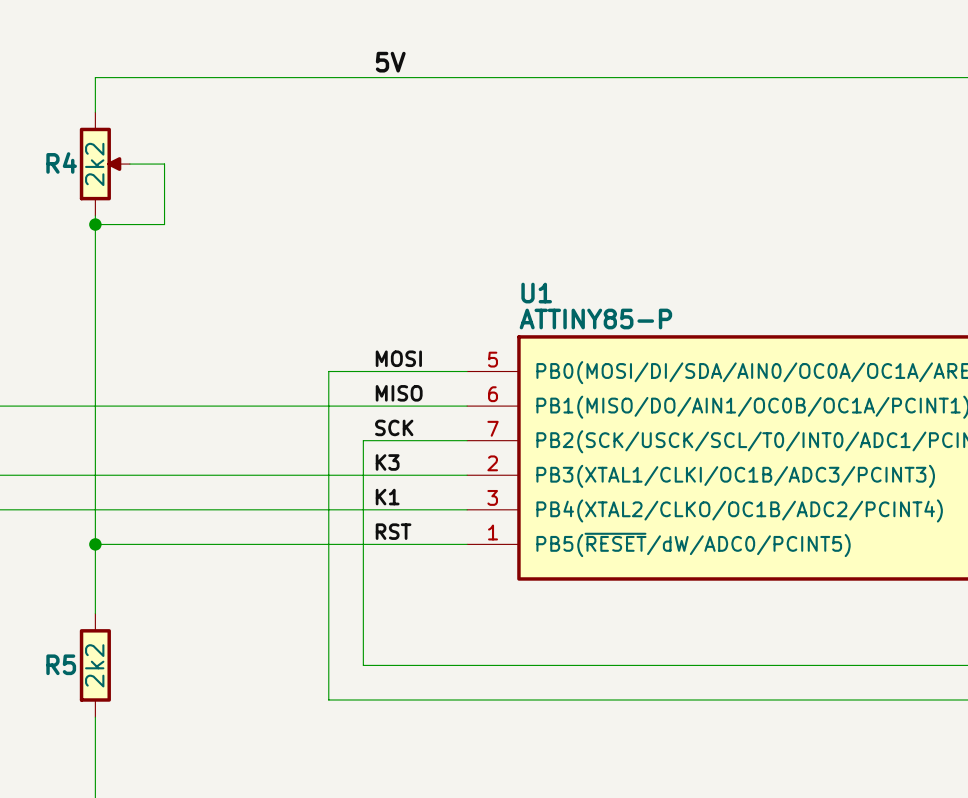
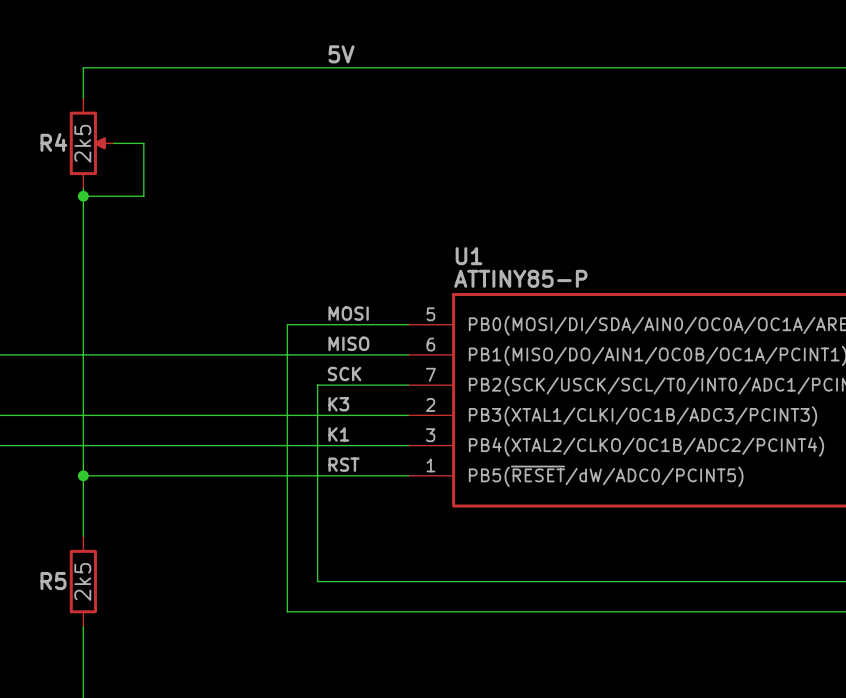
R4 value: 2k2 (94, 164) -> 2k5 (82, 143)
R5 value: 2k2 (94, 665) -> 2k5 (82, 581)

